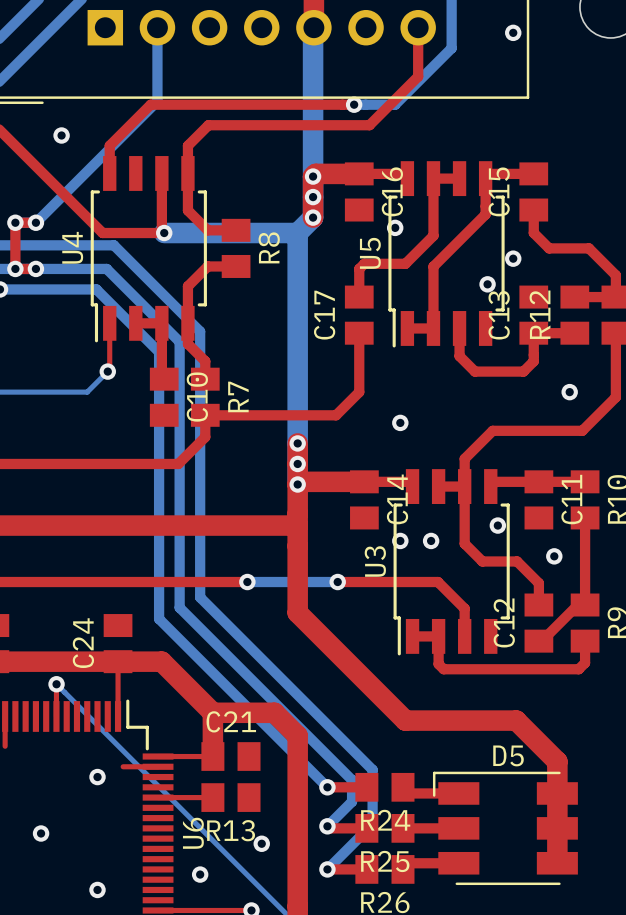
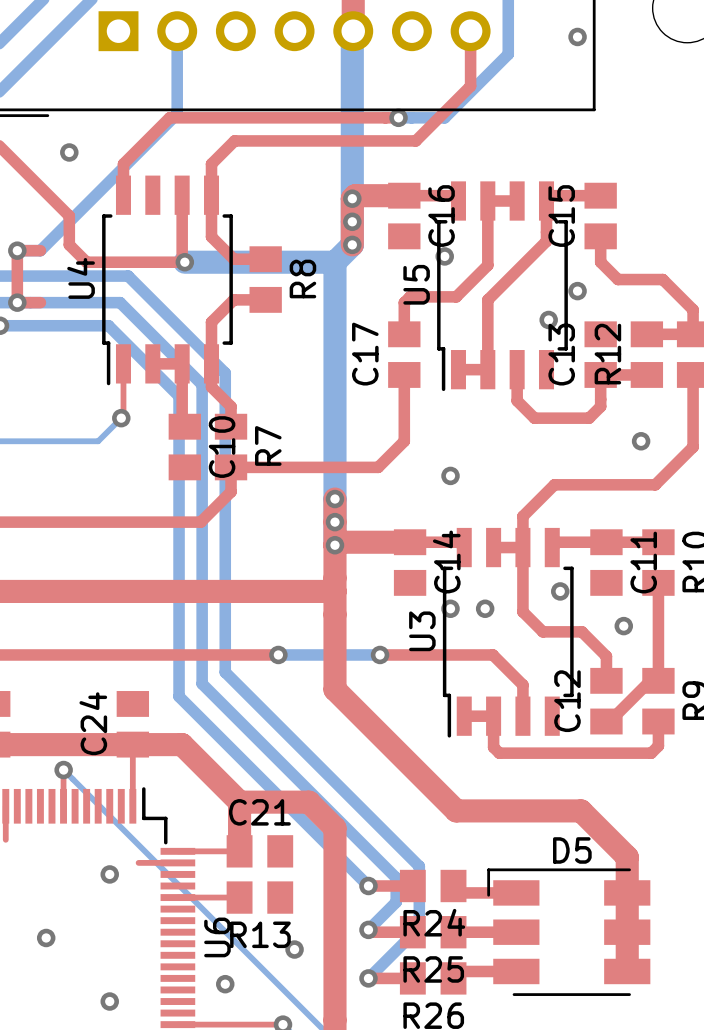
top track: (61, 191) (102, 233) -> (69, 216) (69, 244) (86, 262) (115, 262)
via: (35, 222) -> none
via: (35, 268) -> none

